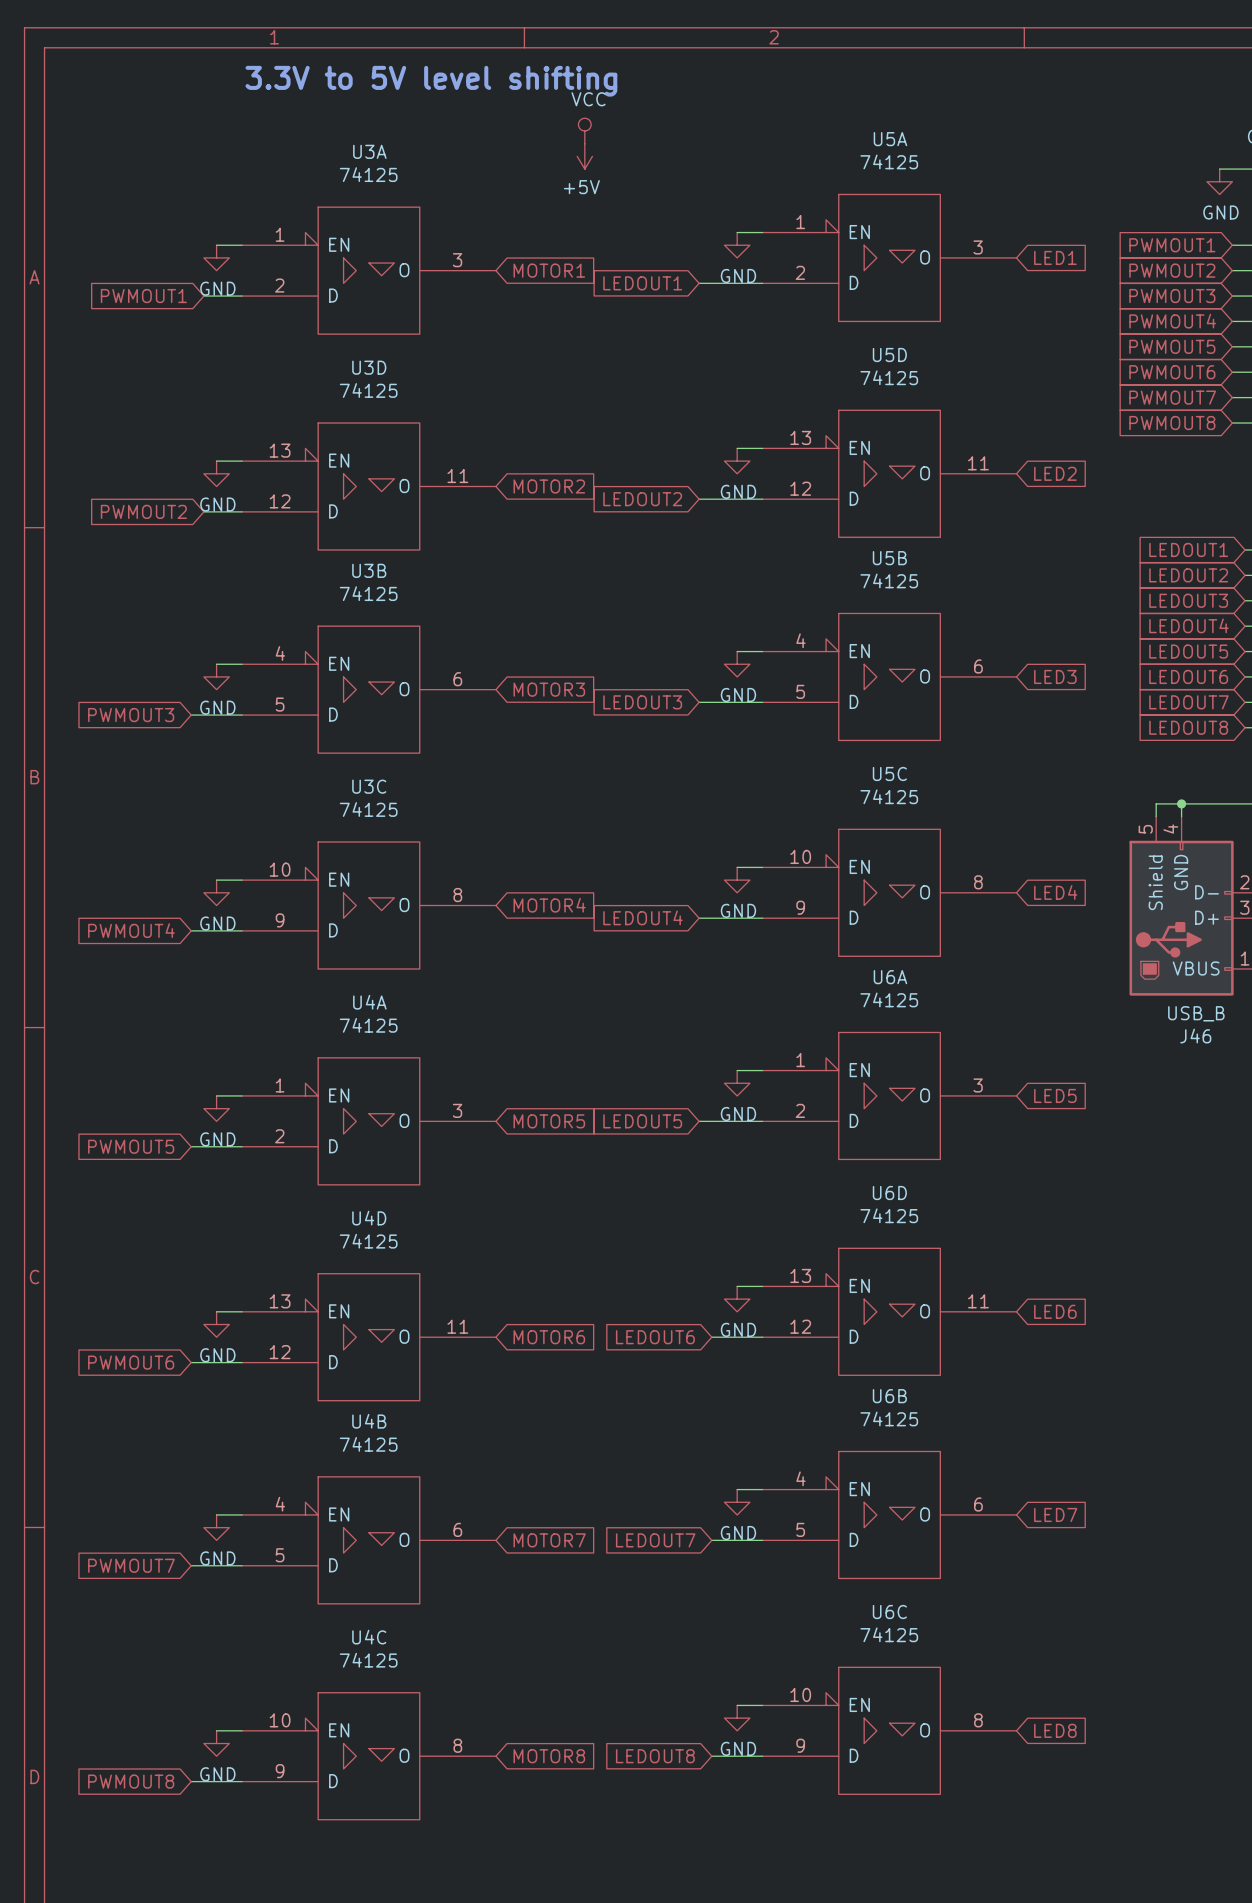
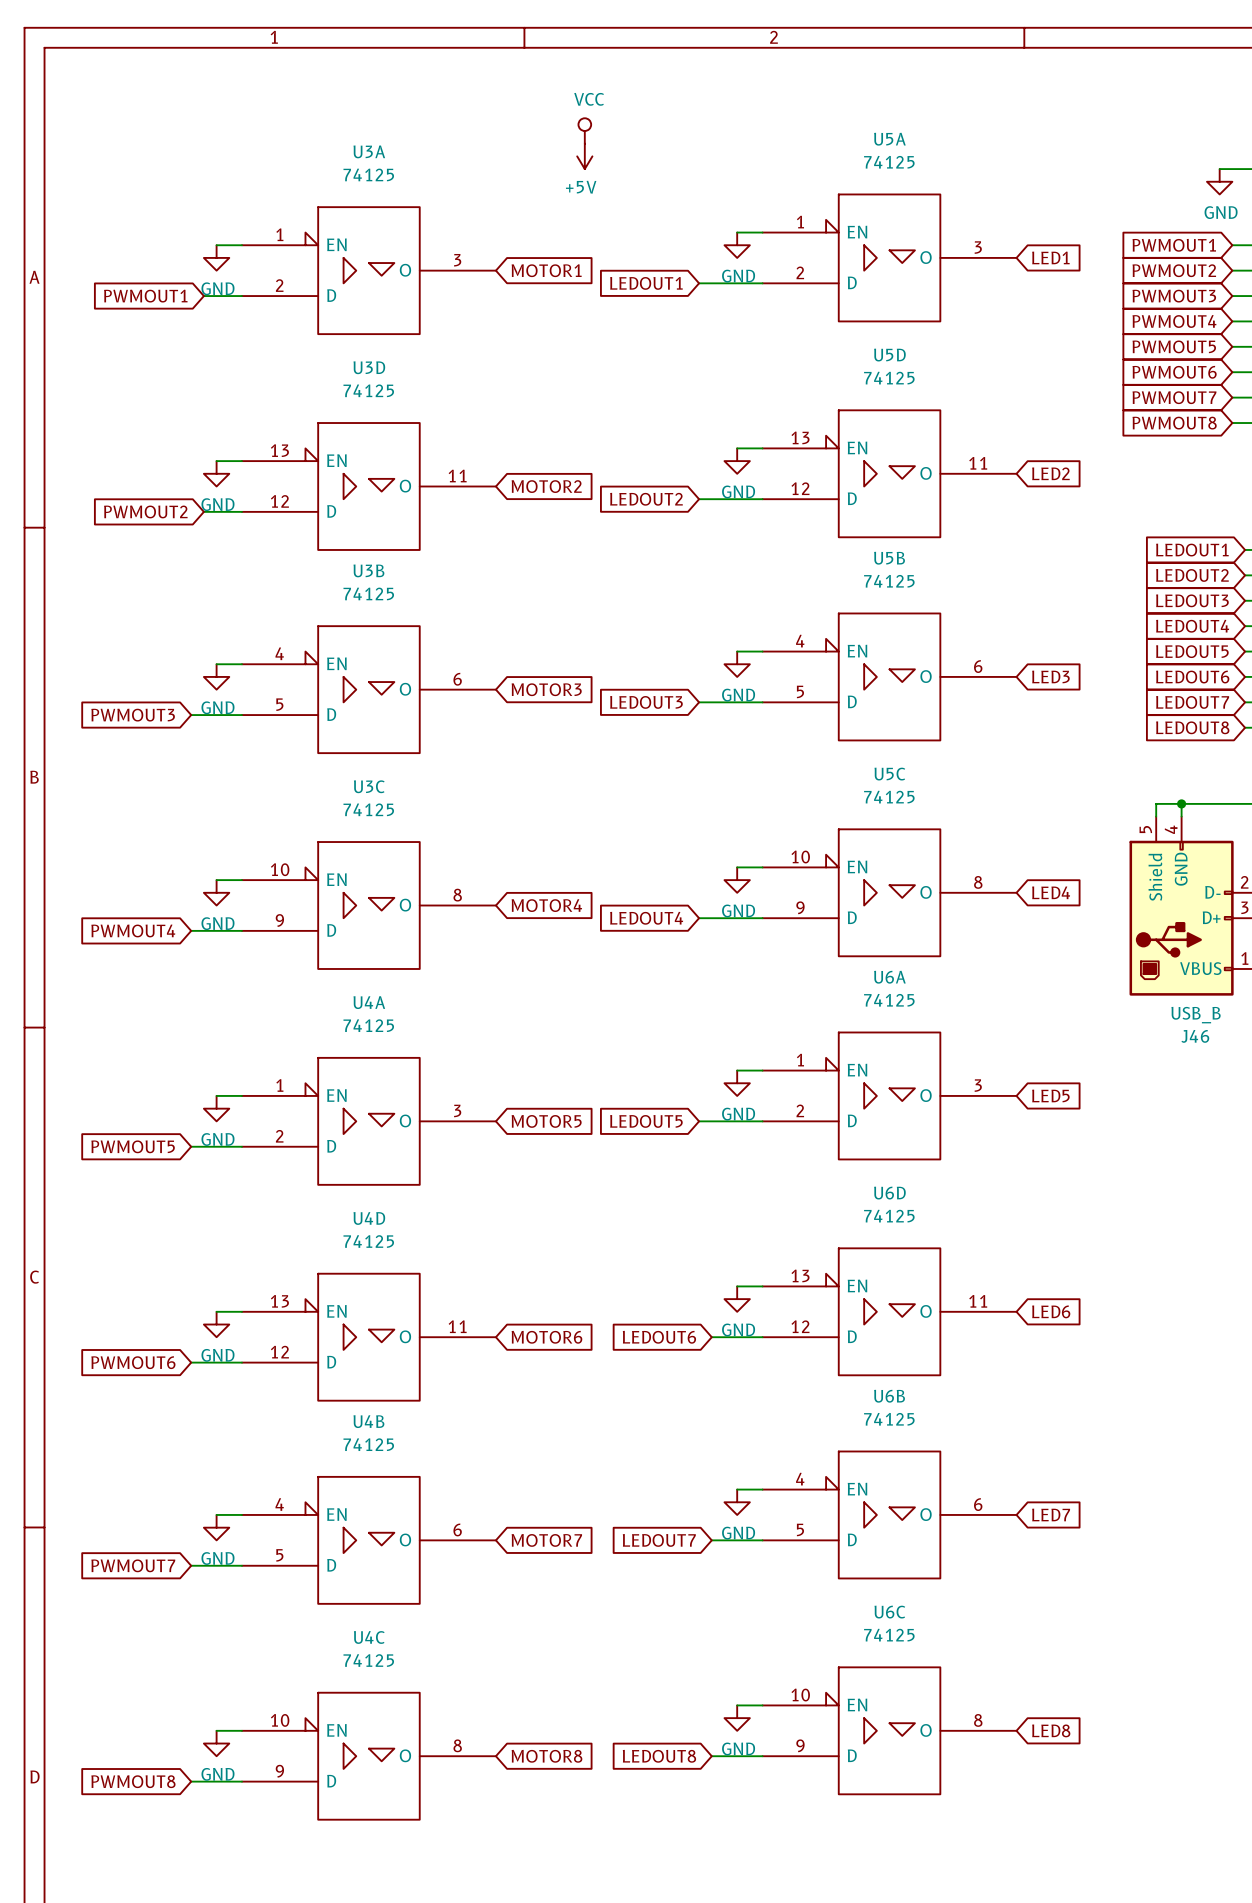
text: 3.3V to 5V level shifting (431, 81) -> none

